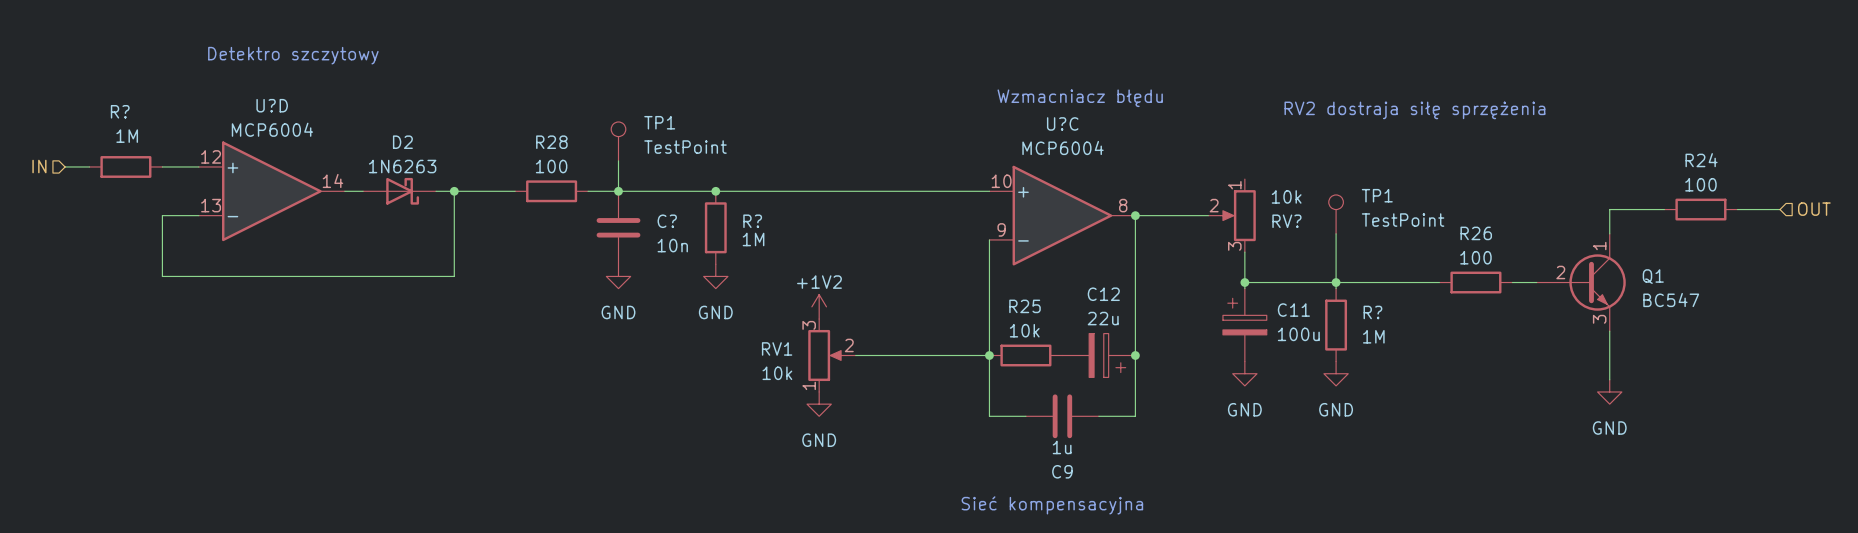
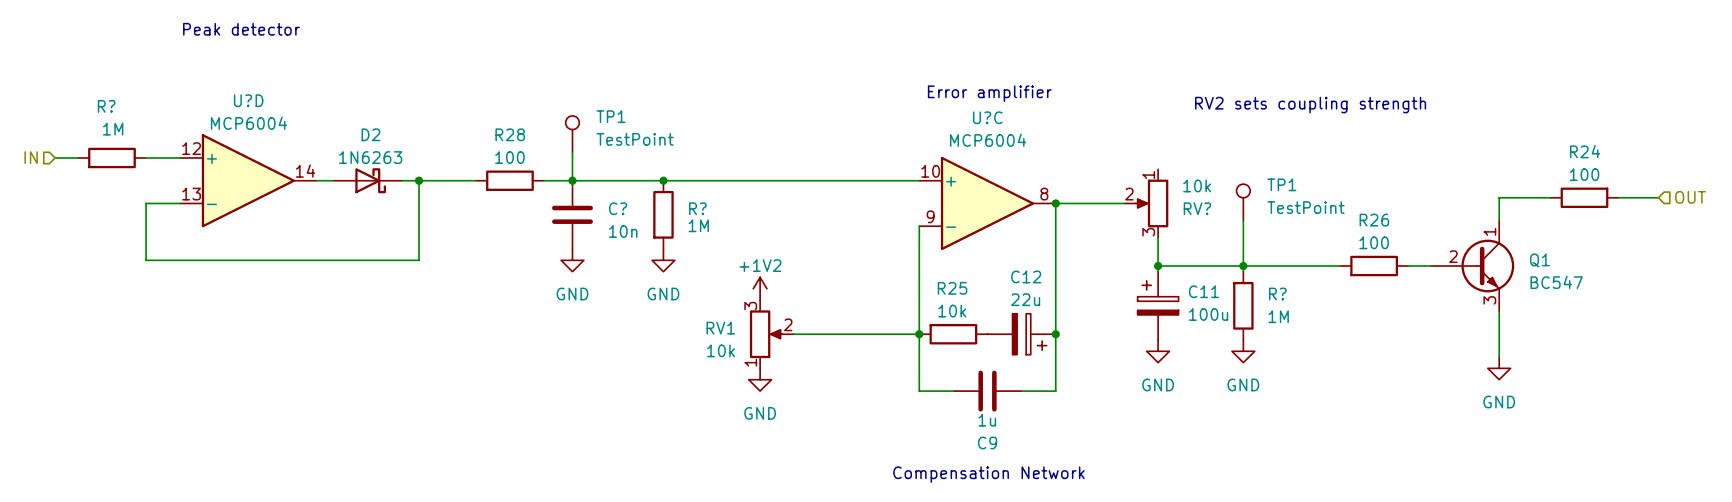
text: none -> Peak detector (241, 29)
text: Detektro szczytowy (293, 55) -> none
text: Wzmacniacz błędu (1080, 98) -> Error amplifier (989, 93)
text: RV2 dostraja siłę sprzężenia (1414, 110) -> RV2 sets coupling strength (1310, 105)
text: Sieć kompensacyjna (1052, 505) -> Compensation Network (988, 474)

